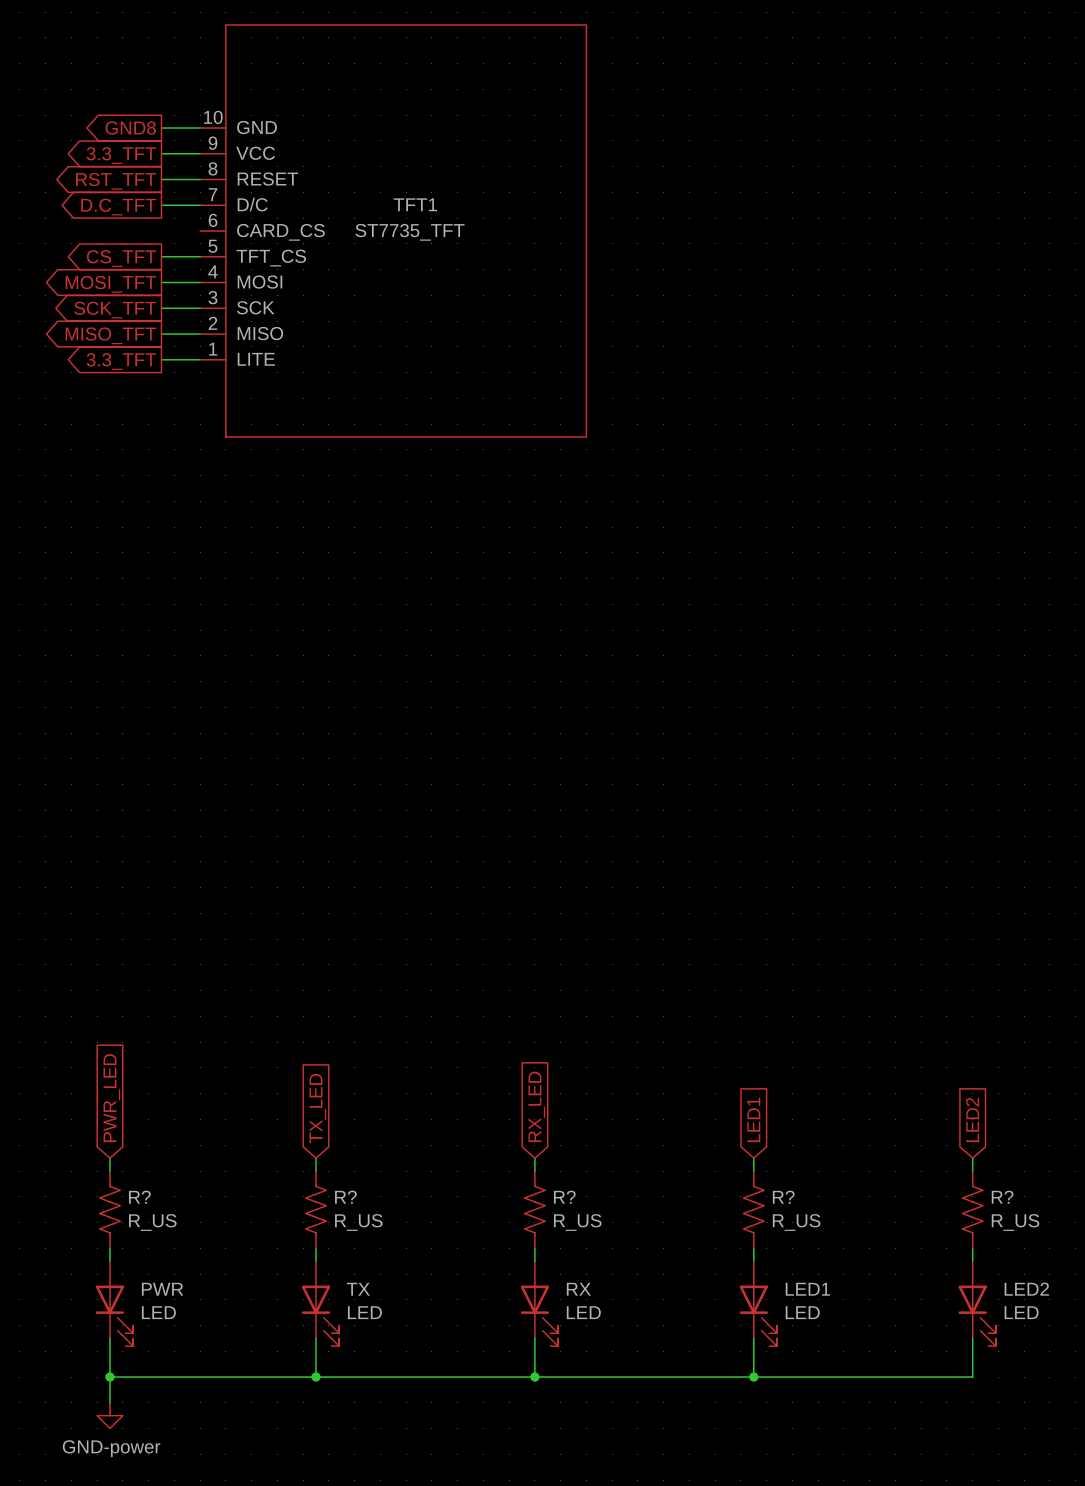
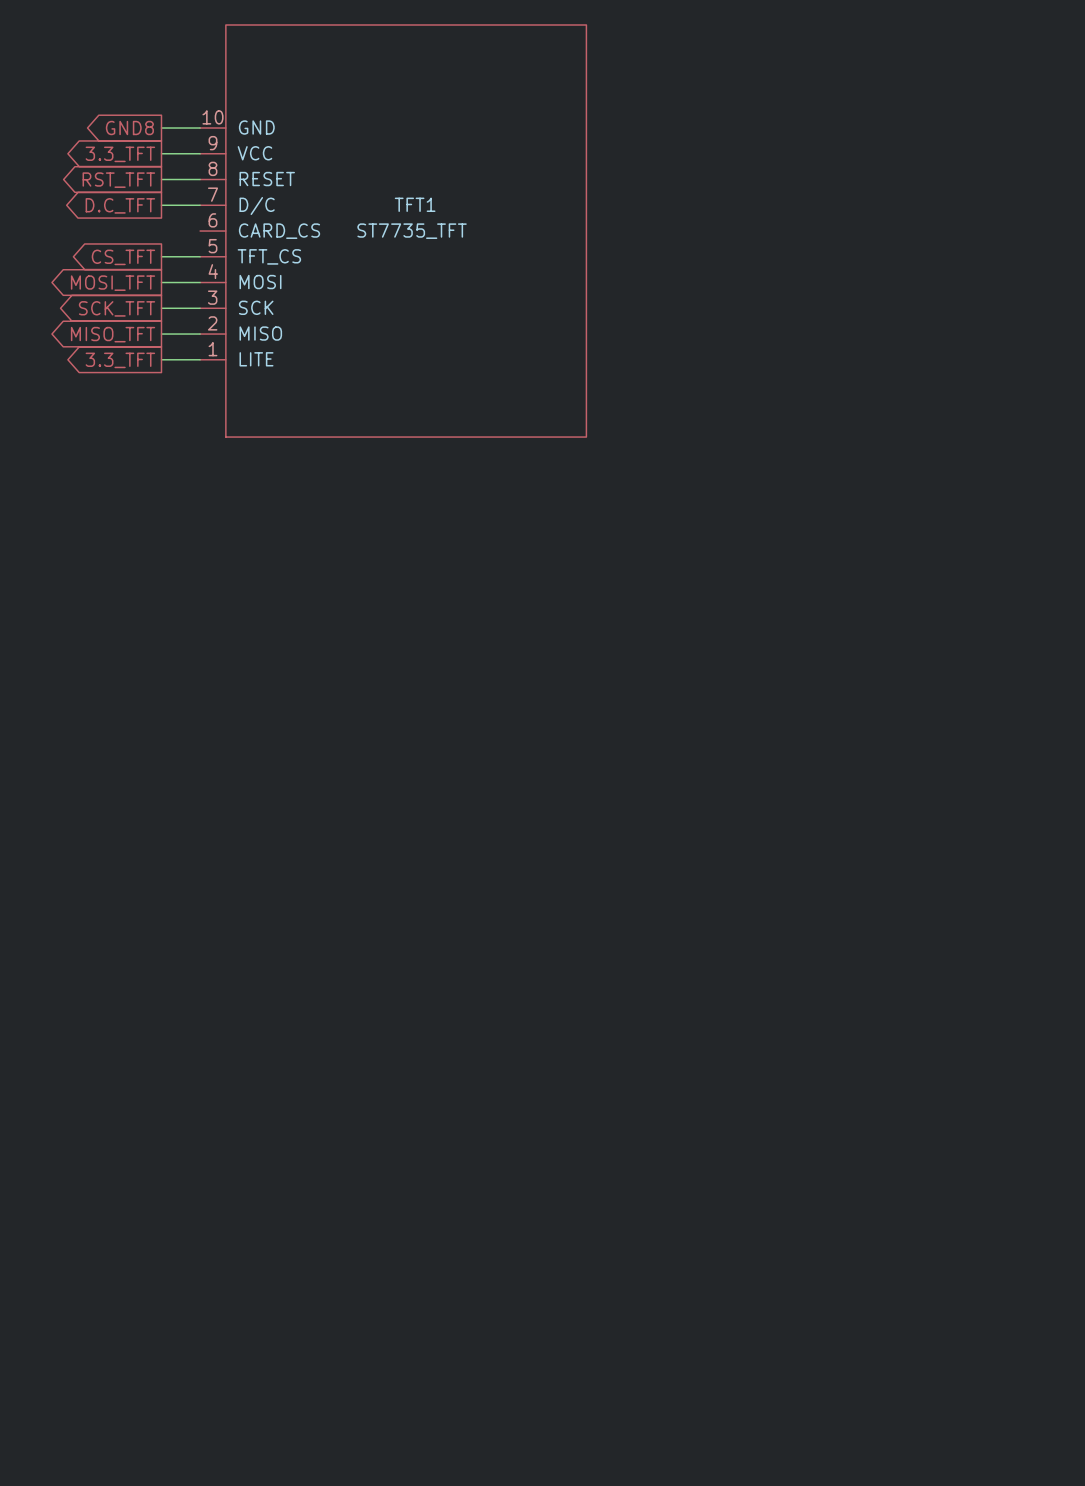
global label: PWR_LED (111, 1098) -> none
global label: RX_LED (536, 1106) -> none
global label: TX_LED (317, 1108) -> none
global label: LED1 (753, 1119) -> none
global label: LED2 (972, 1119) -> none
wire: (109, 1158) (109, 1171) -> none
wire: (316, 1158) (316, 1171) -> none
wire: (534, 1158) (534, 1171) -> none
wire: (753, 1158) (753, 1171) -> none
wire: (972, 1158) (972, 1171) -> none
R?: R_US (109, 1209) -> none
R?: R_US (316, 1209) -> none
R?: R_US (534, 1209) -> none
R?: R_US (753, 1209) -> none
R?: R_US (972, 1209) -> none
wire: (109, 1248) (109, 1261) -> none
wire: (316, 1248) (316, 1261) -> none
wire: (534, 1248) (534, 1261) -> none
wire: (753, 1248) (753, 1261) -> none
wire: (972, 1248) (972, 1261) -> none
PWR: LED (114, 1303) -> none
TX: LED (320, 1303) -> none
RX: LED (539, 1303) -> none
LED1: LED (758, 1303) -> none
LED2: LED (977, 1303) -> none
wire: (109, 1338) (109, 1402) -> none
wire: (316, 1338) (316, 1377) -> none
wire: (534, 1338) (534, 1377) -> none
wire: (753, 1338) (753, 1377) -> none
wire: (972, 1338) (972, 1377) (109, 1377) -> none
junction: (109, 1377) -> none
junction: (316, 1377) -> none
junction: (534, 1377) -> none
junction: (753, 1377) -> none
power symbol: GND-power (109, 1415) -> none

